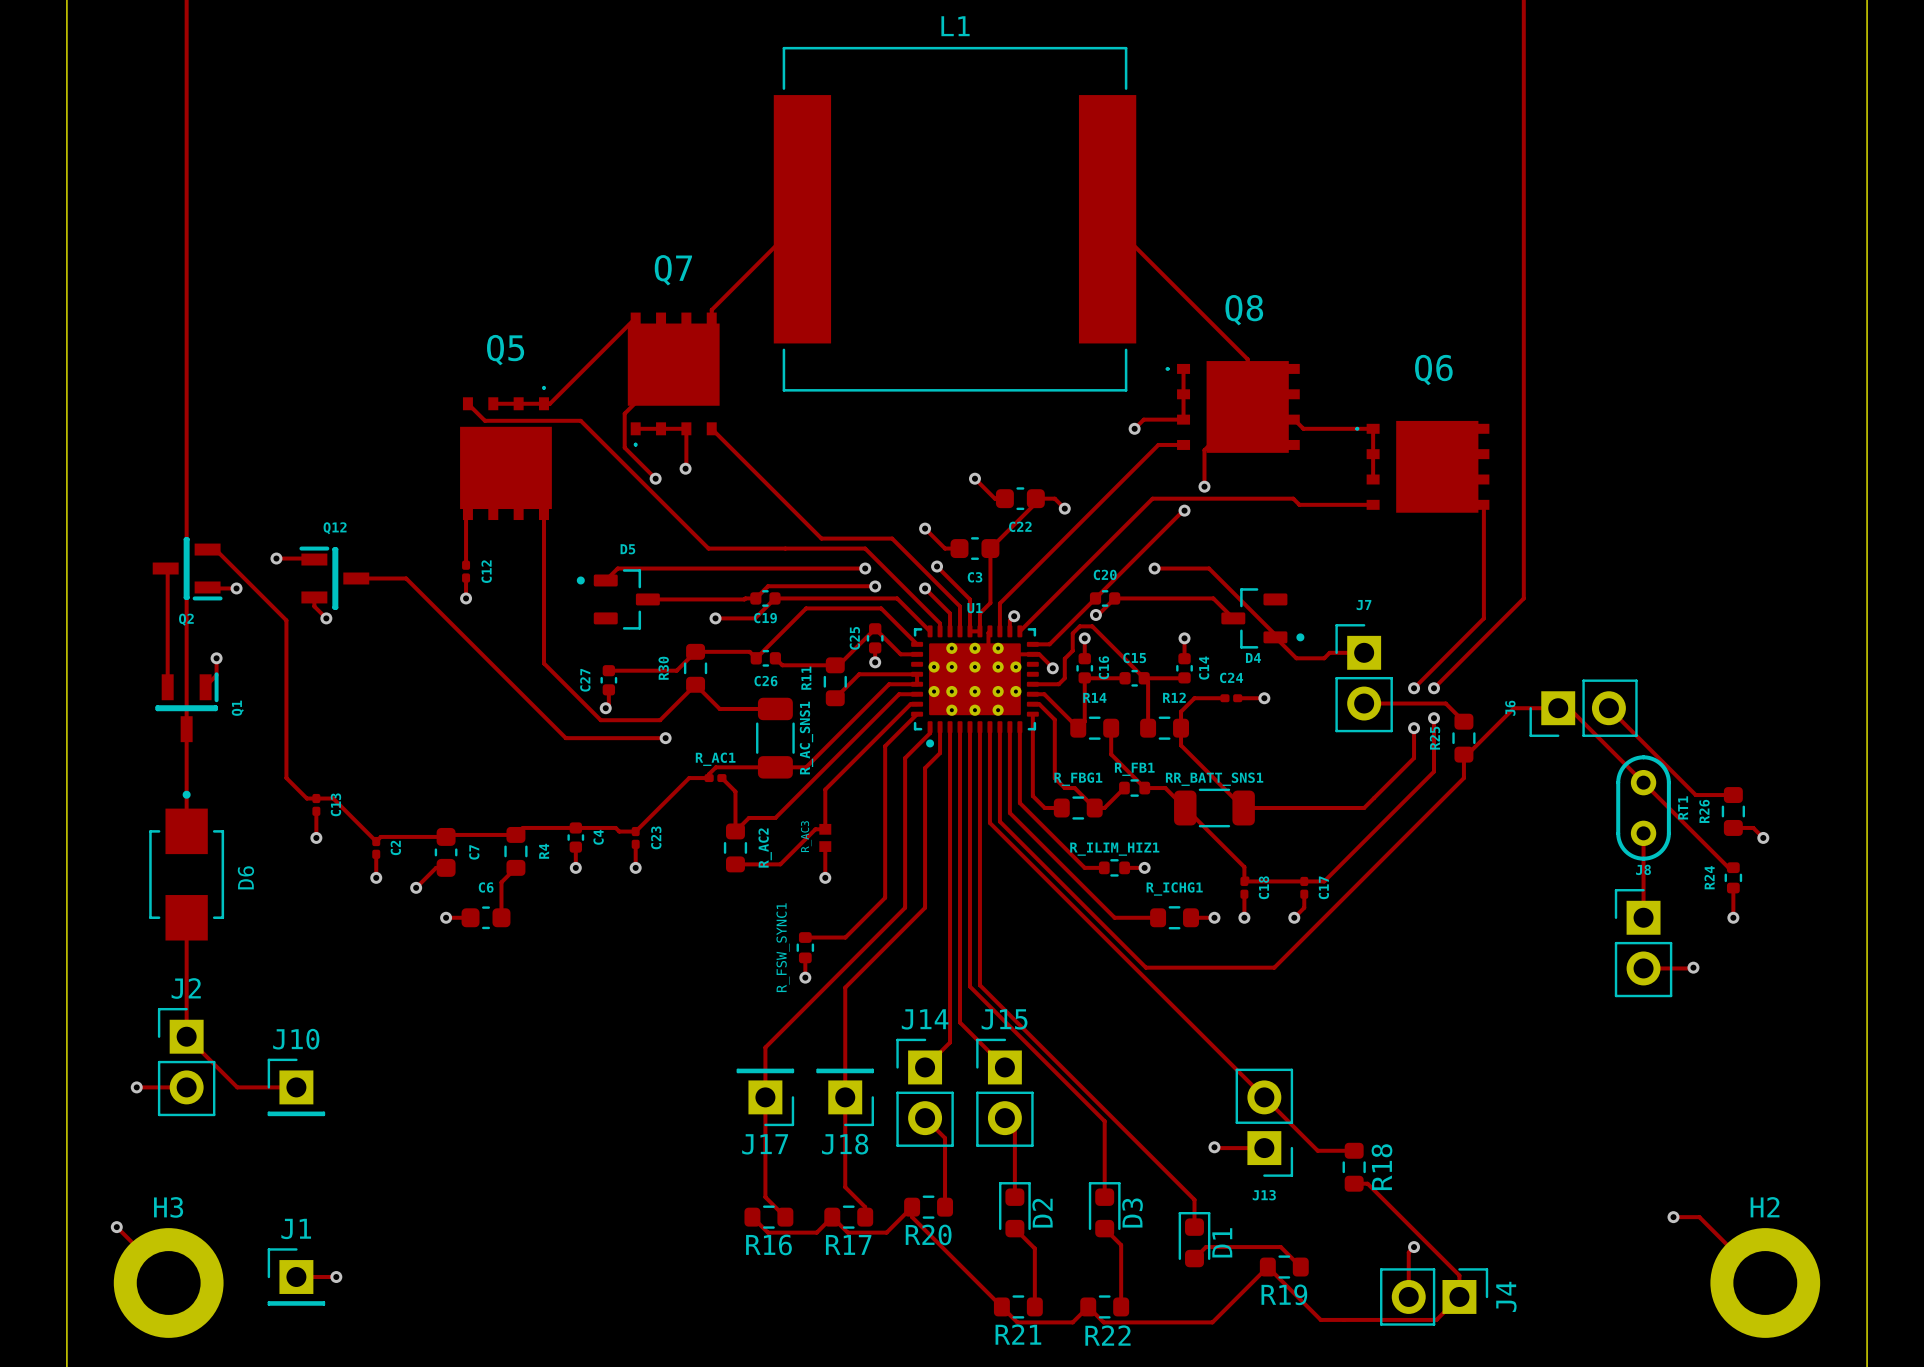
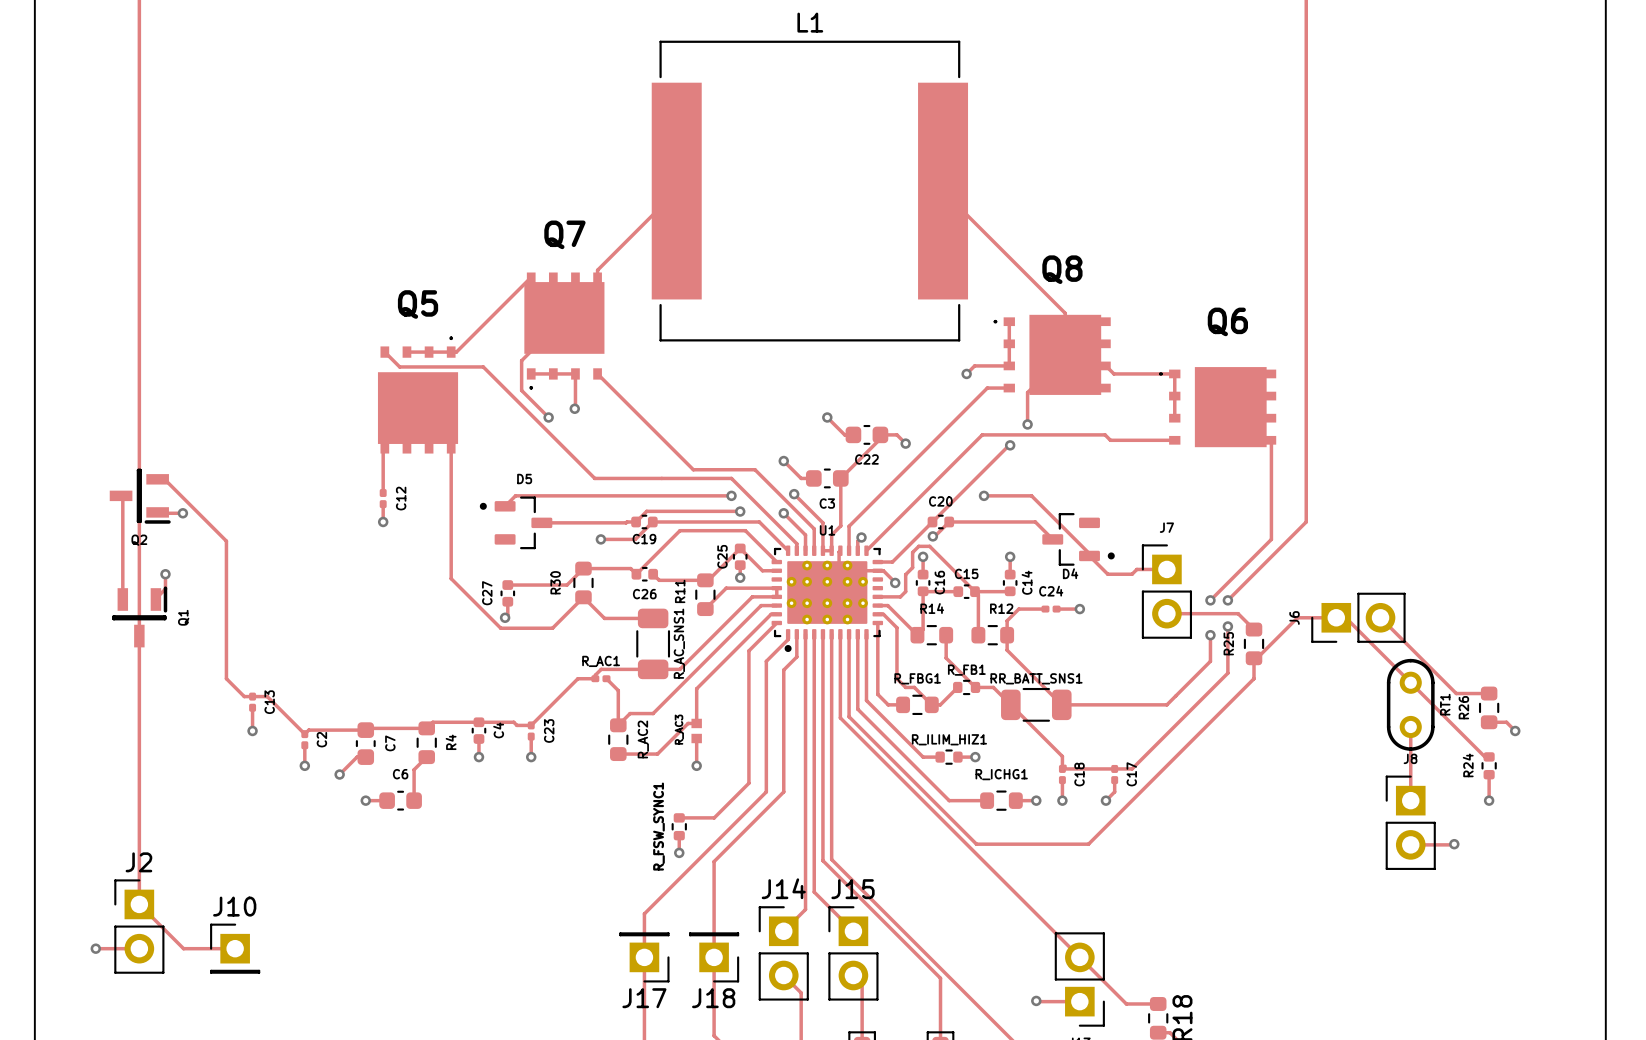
track: (276, 558) (314, 559) -> none
via: (276, 558) -> none
Q12: (334, 578) -> none
track: (356, 578) (406, 578) (565, 738) (665, 738) -> none
track: (314, 597) (314, 606) (326, 618) -> none
via: (326, 618) -> none
via: (665, 738) -> none
track: none -> (139, 725) (139, 800)
D6: (186, 865) -> none

